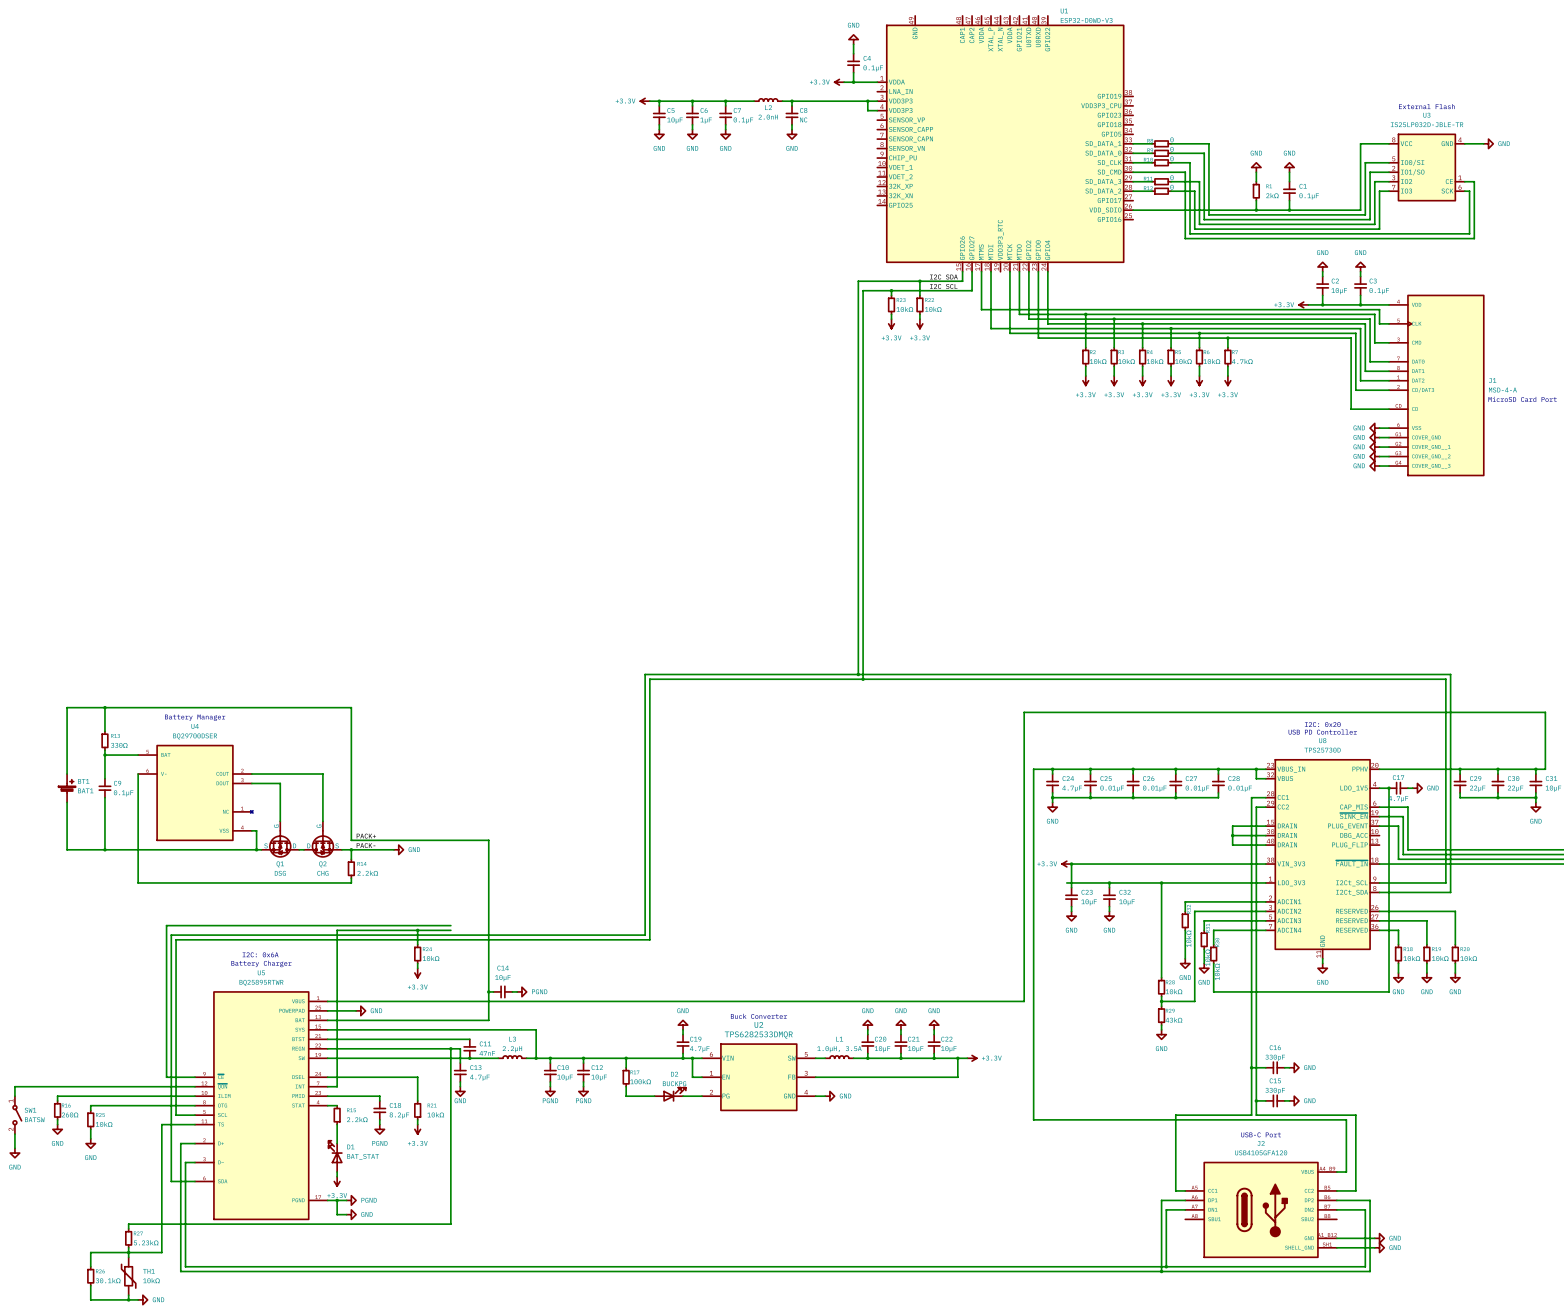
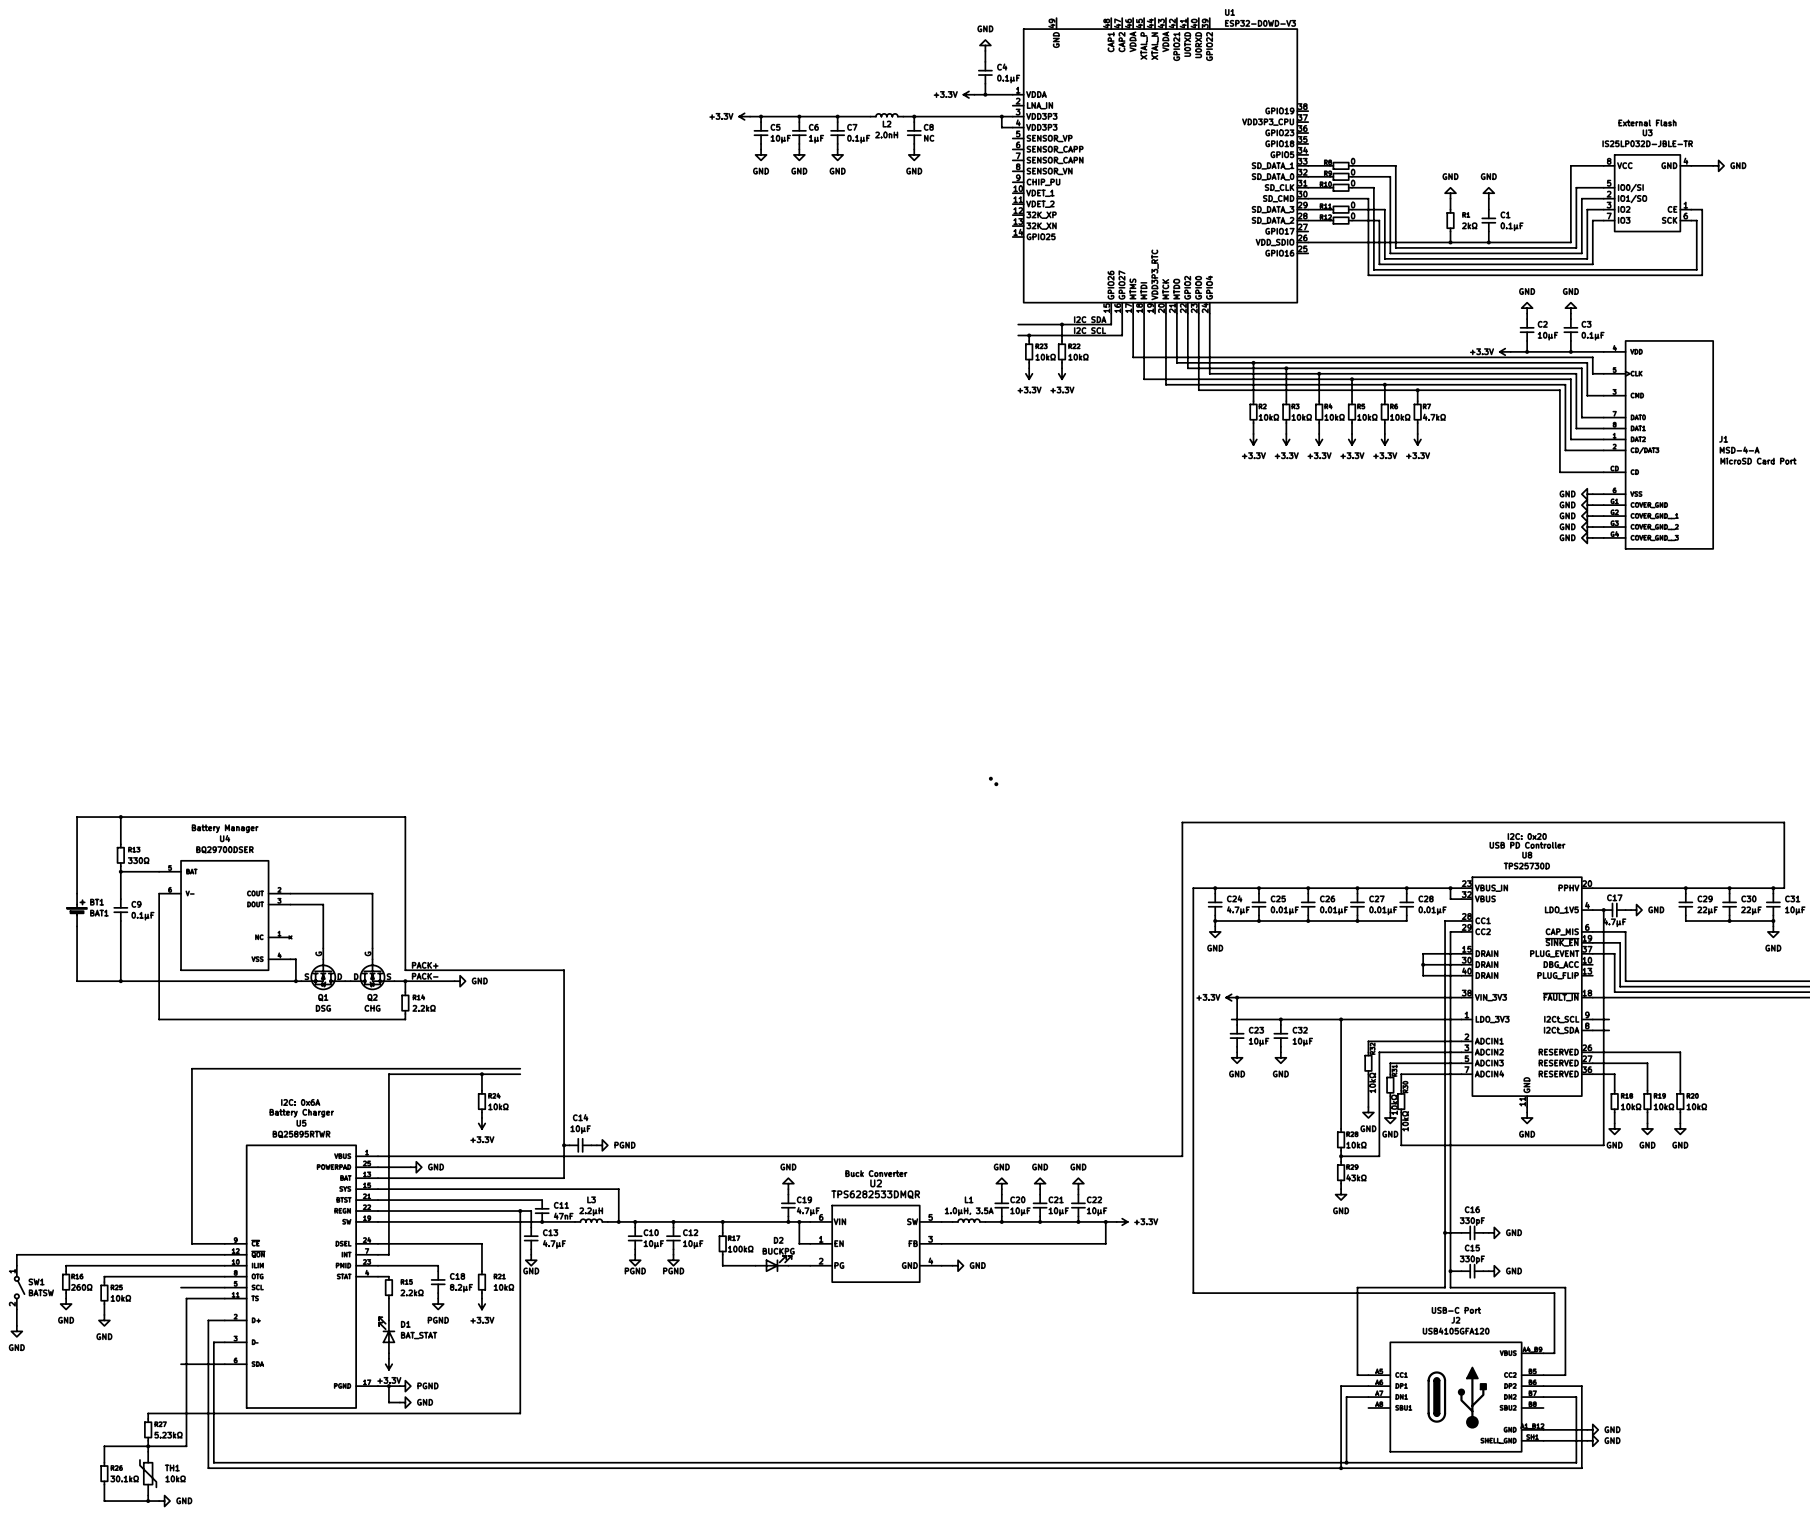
wire: (882, 281) (858, 281) (858, 674) -> none
wire: (882, 290) (863, 290) (863, 679) -> none
wire: (1393, 882) (1445, 882) (1445, 679) (649, 679) (649, 939) (176, 939) (176, 1115) -> (181, 1287) (202, 1287)
wire: (1393, 892) (1450, 892) (1450, 674) (645, 674) (645, 935) (171, 935) (171, 1181) -> (181, 1364) (197, 1364)

